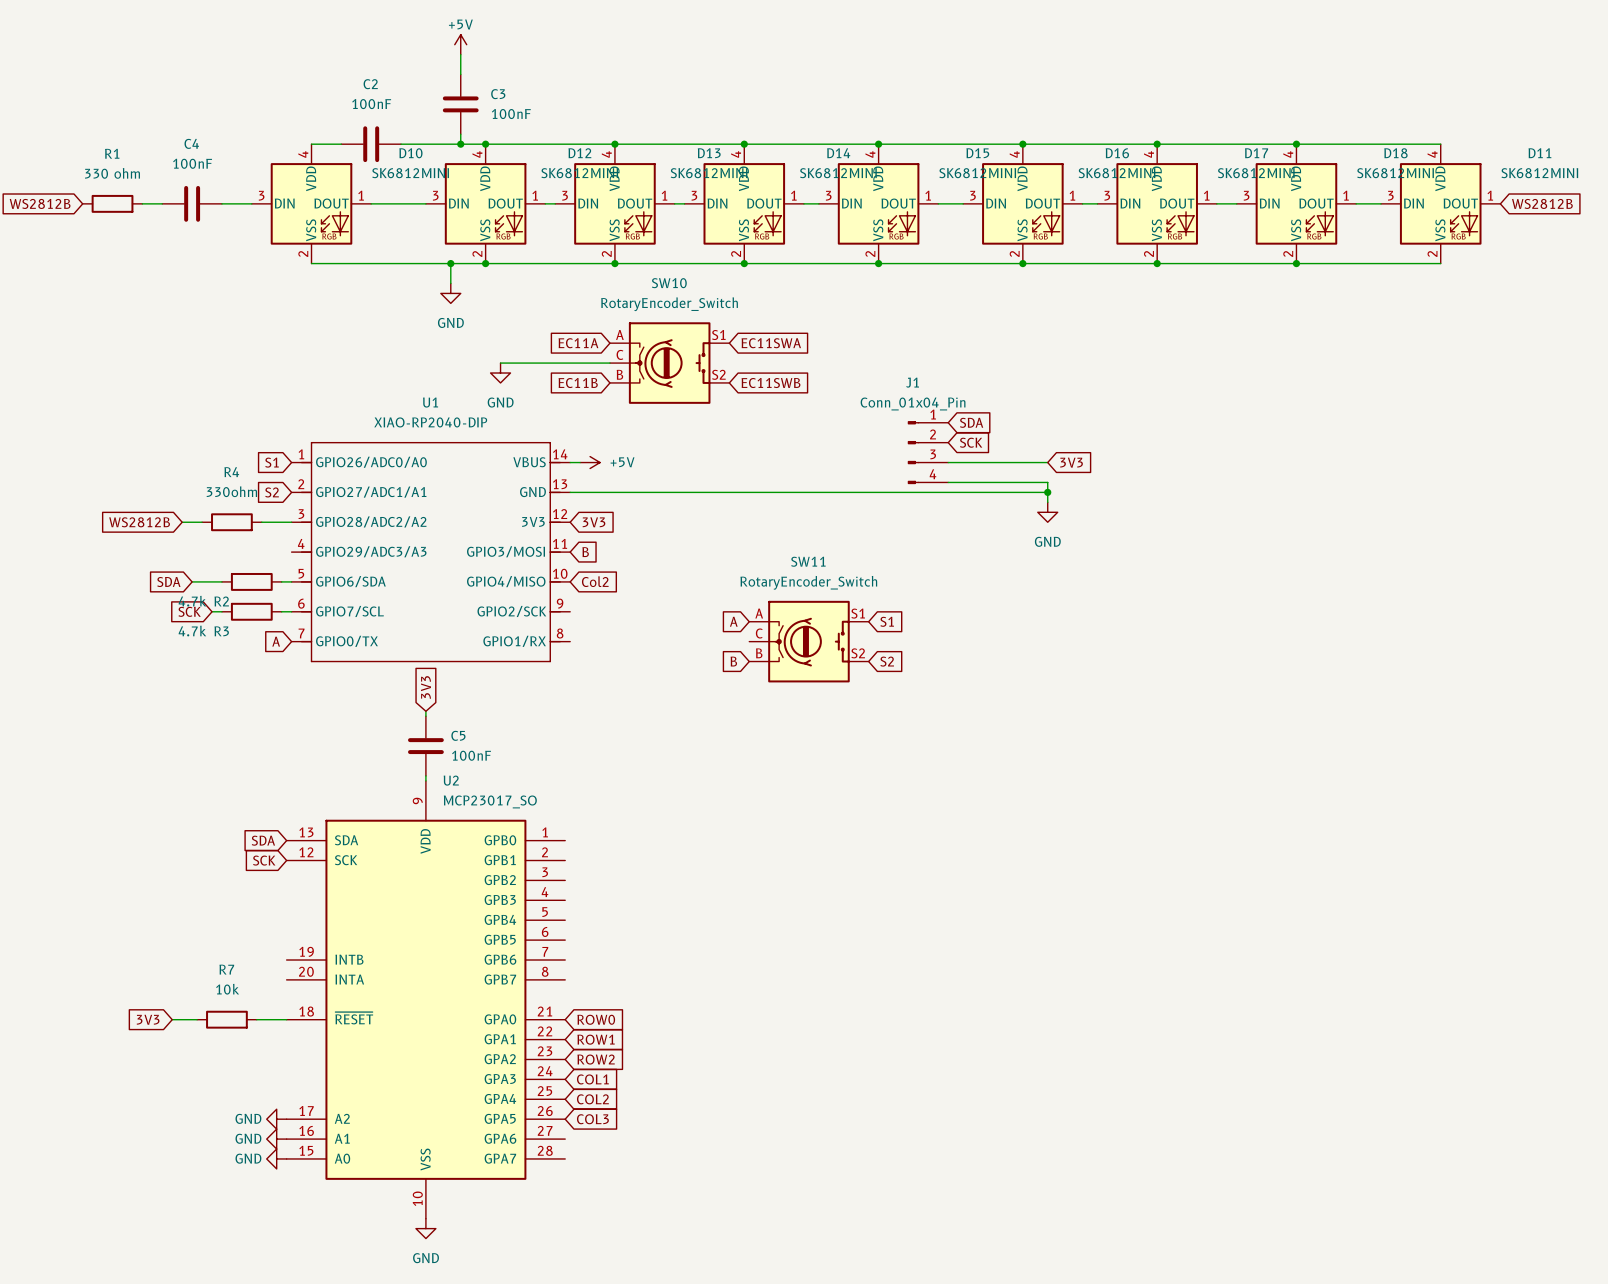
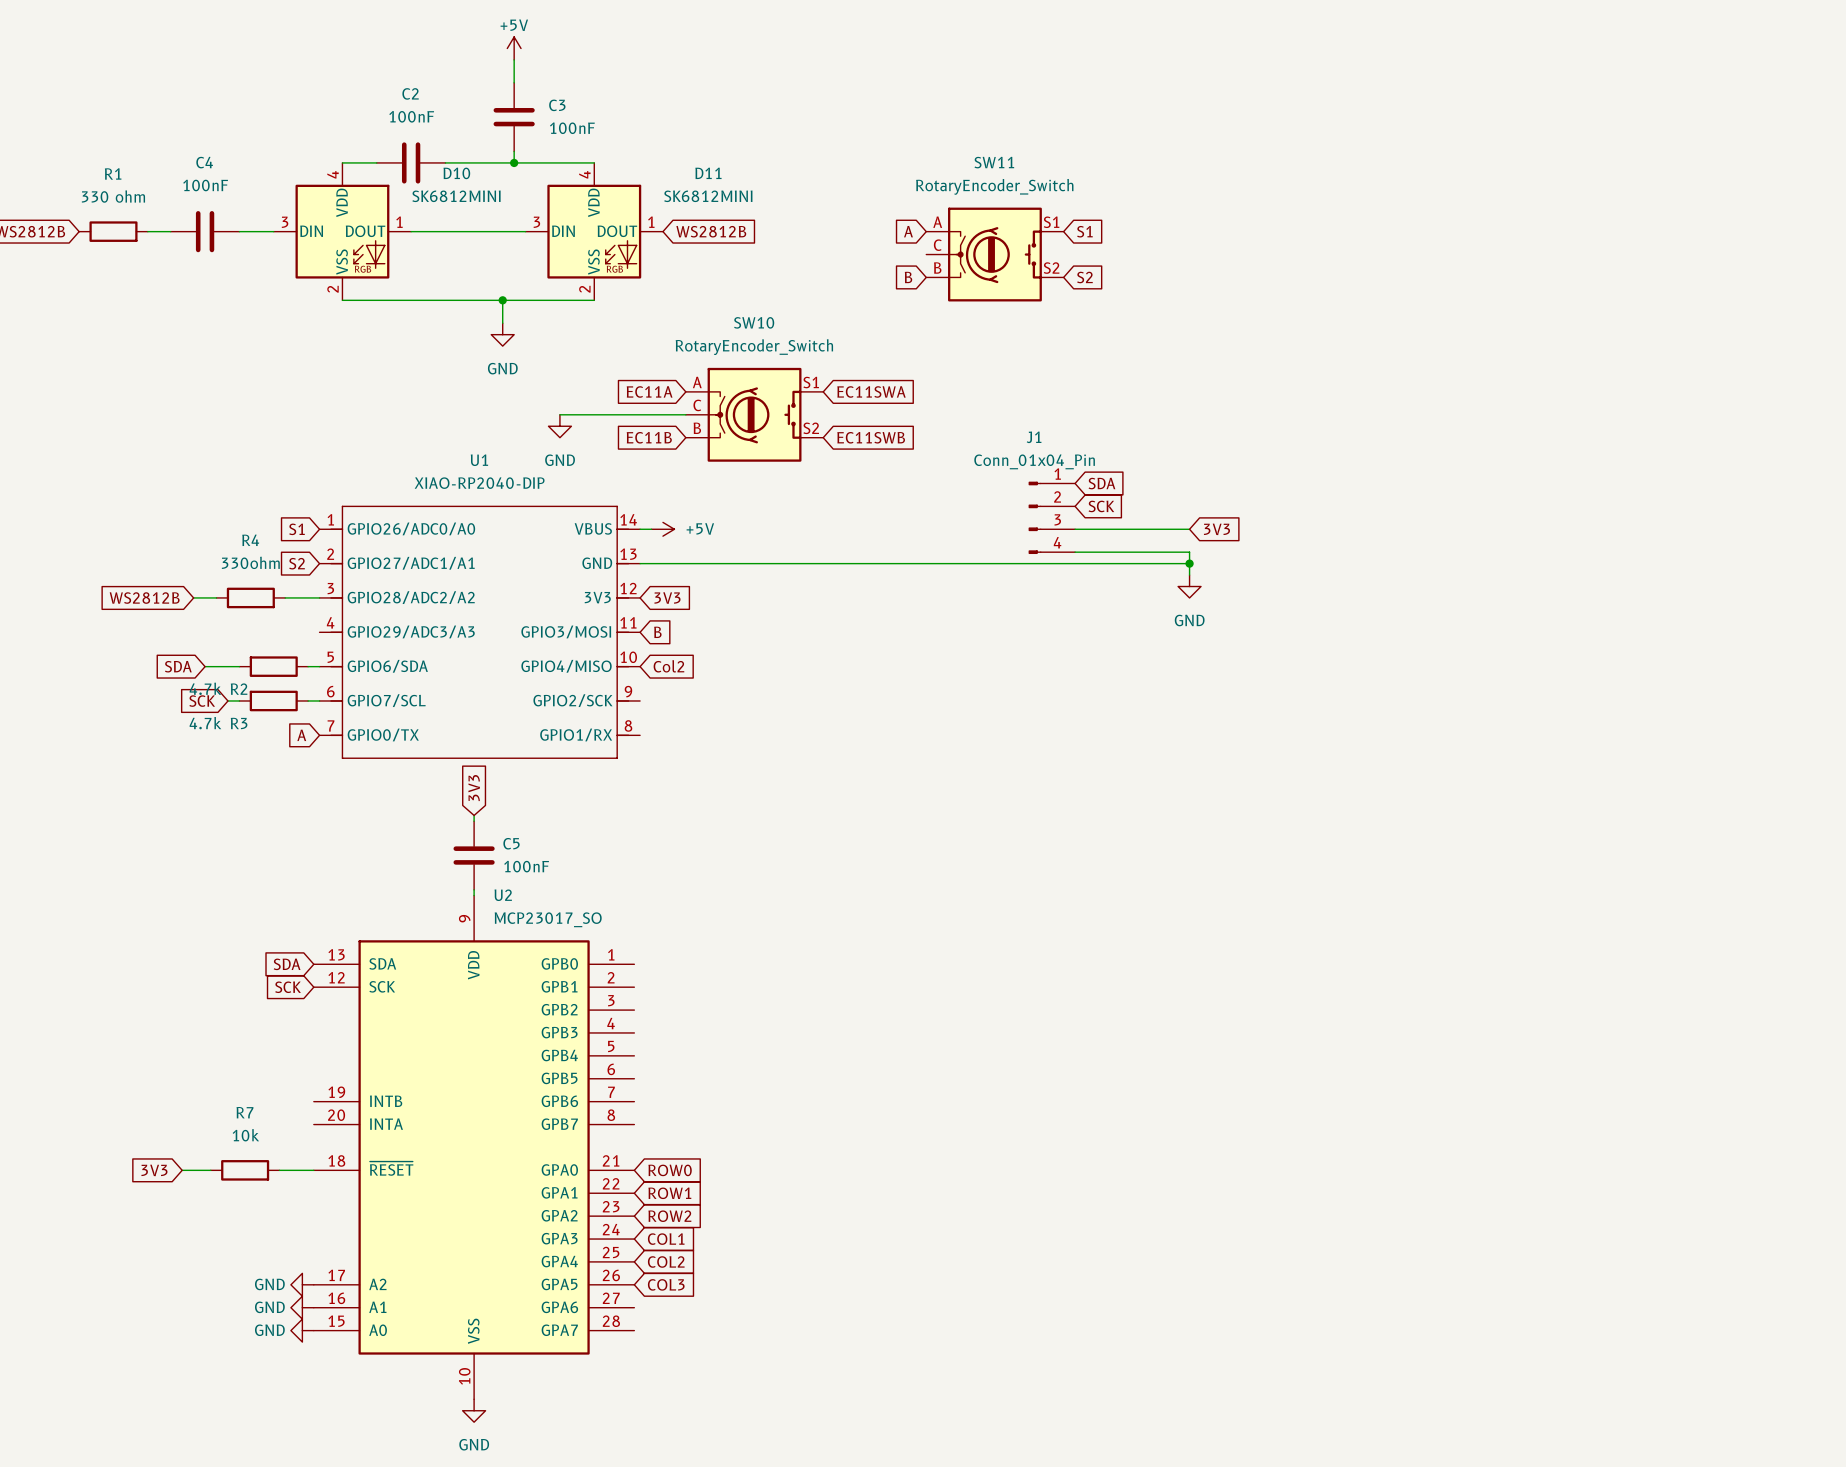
junction: (485, 144) -> none
wire: (530, 144) (1440, 144) -> none
junction: (614, 144) -> none
junction: (744, 144) -> none
junction: (878, 144) -> none
junction: (1022, 144) -> none
junction: (1157, 144) -> none
junction: (1296, 144) -> none
D12: SK6812MINI (485, 203) -> none
D13: SK6812MINI (614, 203) -> none
global label: none -> WS2812B (711, 231)
wire: (674, 203) (684, 203) -> none
D14: SK6812MINI (744, 203) -> none
wire: (803, 203) (818, 203) -> none
global label: none -> A (908, 231)
D15: SK6812MINI (878, 203) -> none
wire: (938, 203) (963, 203) -> none
global label: none -> S1 (1084, 231)
D16: SK6812MINI (1022, 203) -> none
wire: (1082, 203) (1097, 203) -> none
D17: SK6812MINI (1157, 203) -> none
wire: (1216, 203) (1236, 203) -> none
D18: SK6812MINI (1296, 203) -> none
wire: (1356, 203) (1381, 203) -> none
D11 position: (1440, 203) -> (594, 231)
global label: WS2812B (1542, 203) -> none
global label: none -> B (908, 277)
global label: none -> S2 (1084, 277)
junction: (485, 263) -> none
wire: (530, 263) (1440, 263) -> none
junction: (614, 263) -> none
junction: (744, 263) -> none
junction: (878, 263) -> none
junction: (1022, 263) -> none
junction: (1157, 263) -> none
junction: (1296, 263) -> none
global label: A (733, 621) -> none
global label: S1 (887, 621) -> none
SW11 position: (808, 641) -> (994, 254)
global label: B (733, 661) -> none
global label: S2 (887, 661) -> none

